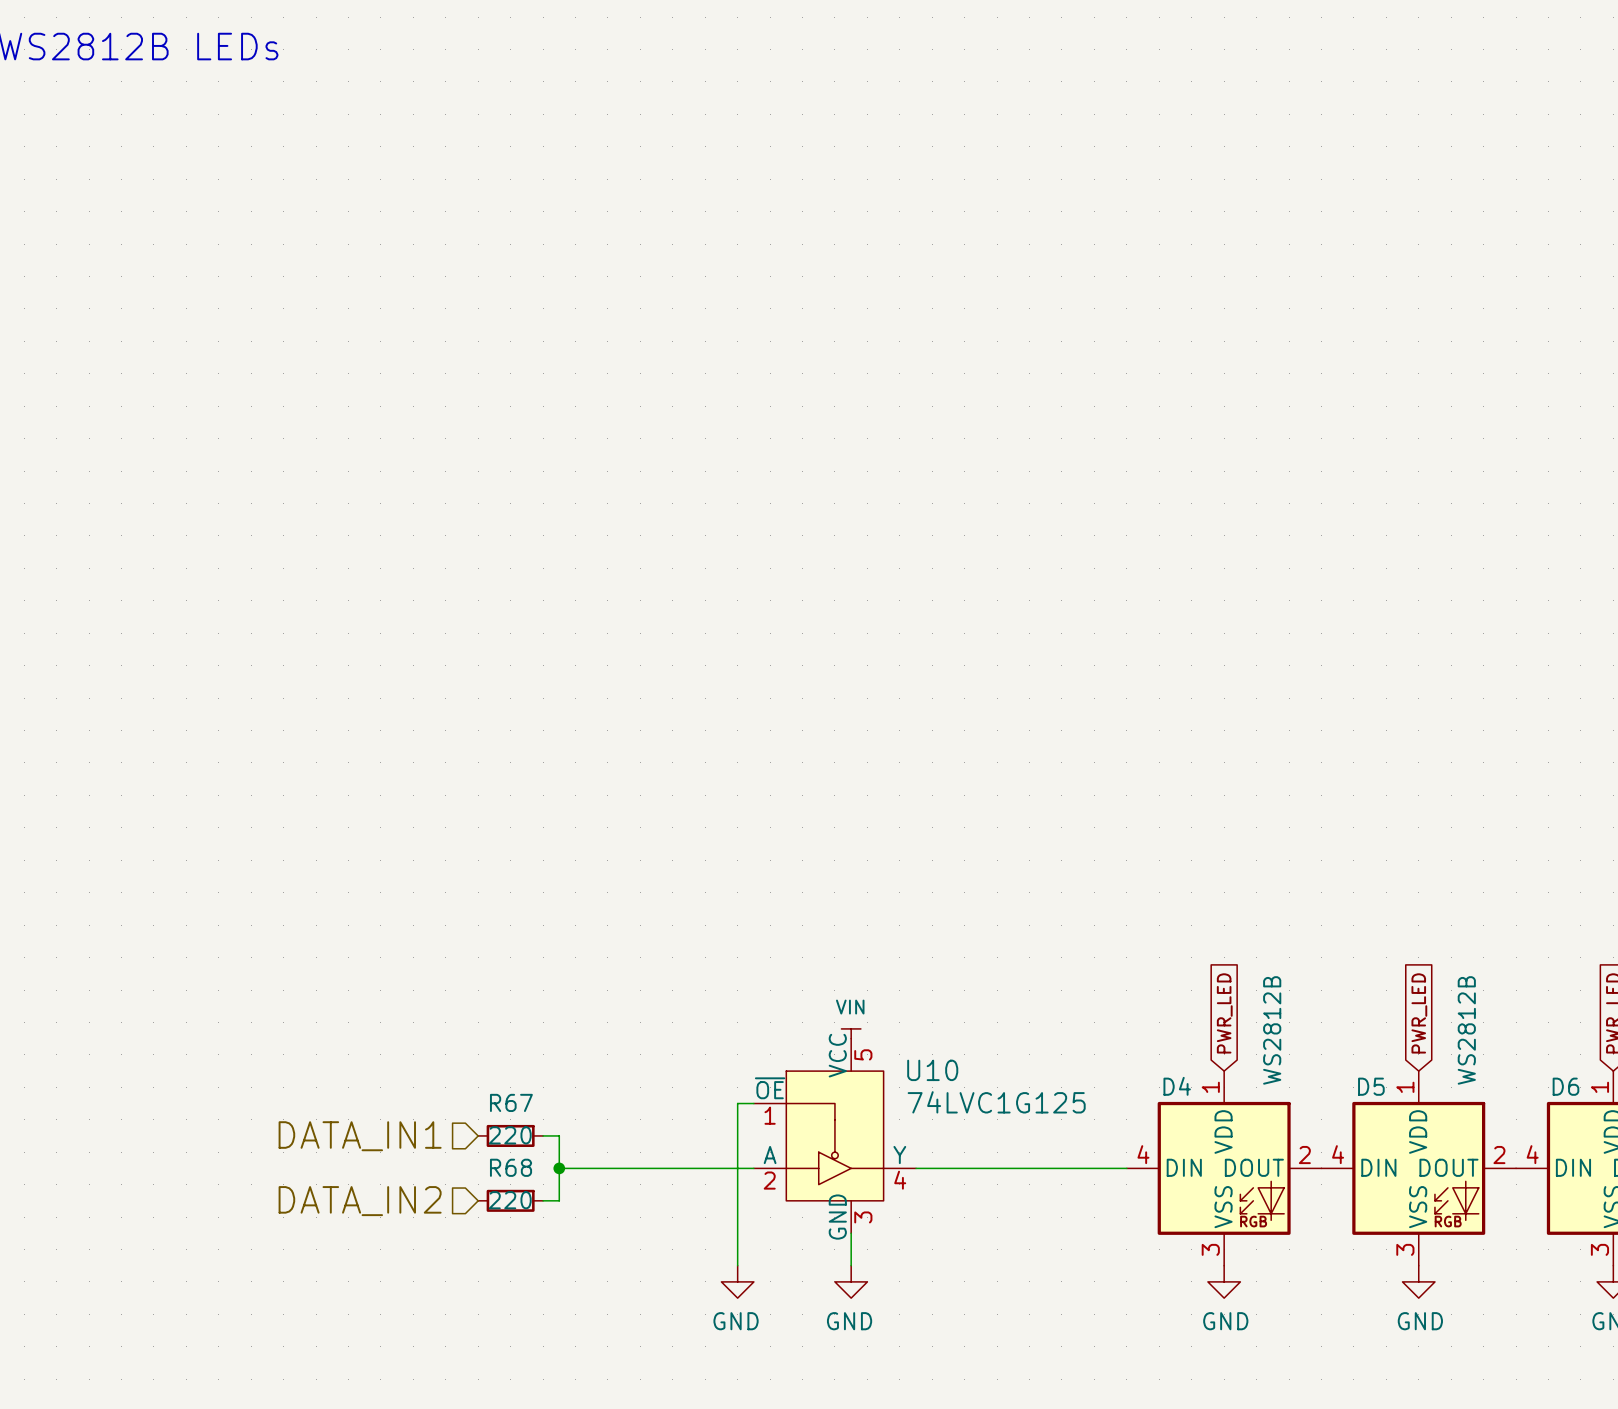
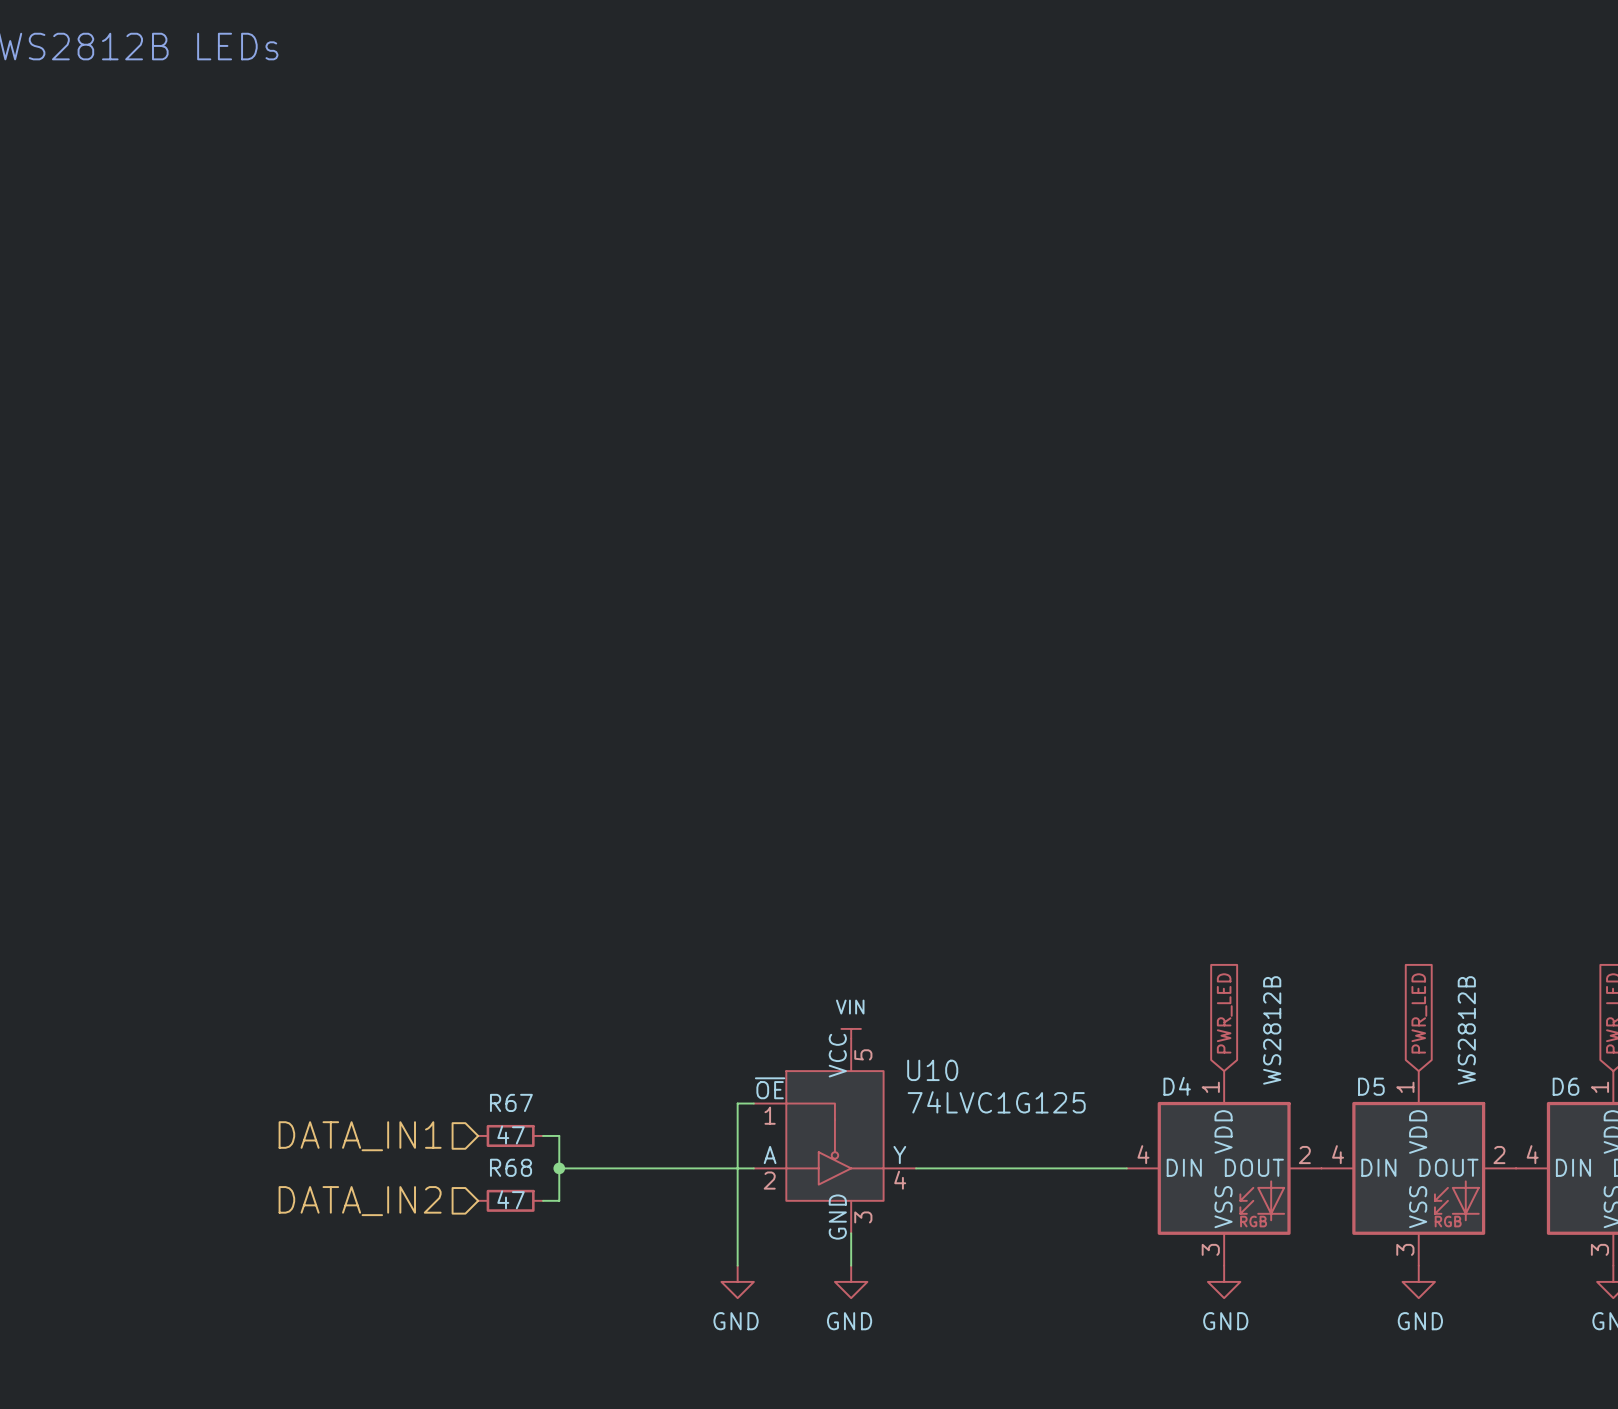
R67 value: 220 (510, 1135) -> 47 (511, 1134)
R68 value: 220 (510, 1200) -> 47 (511, 1199)

